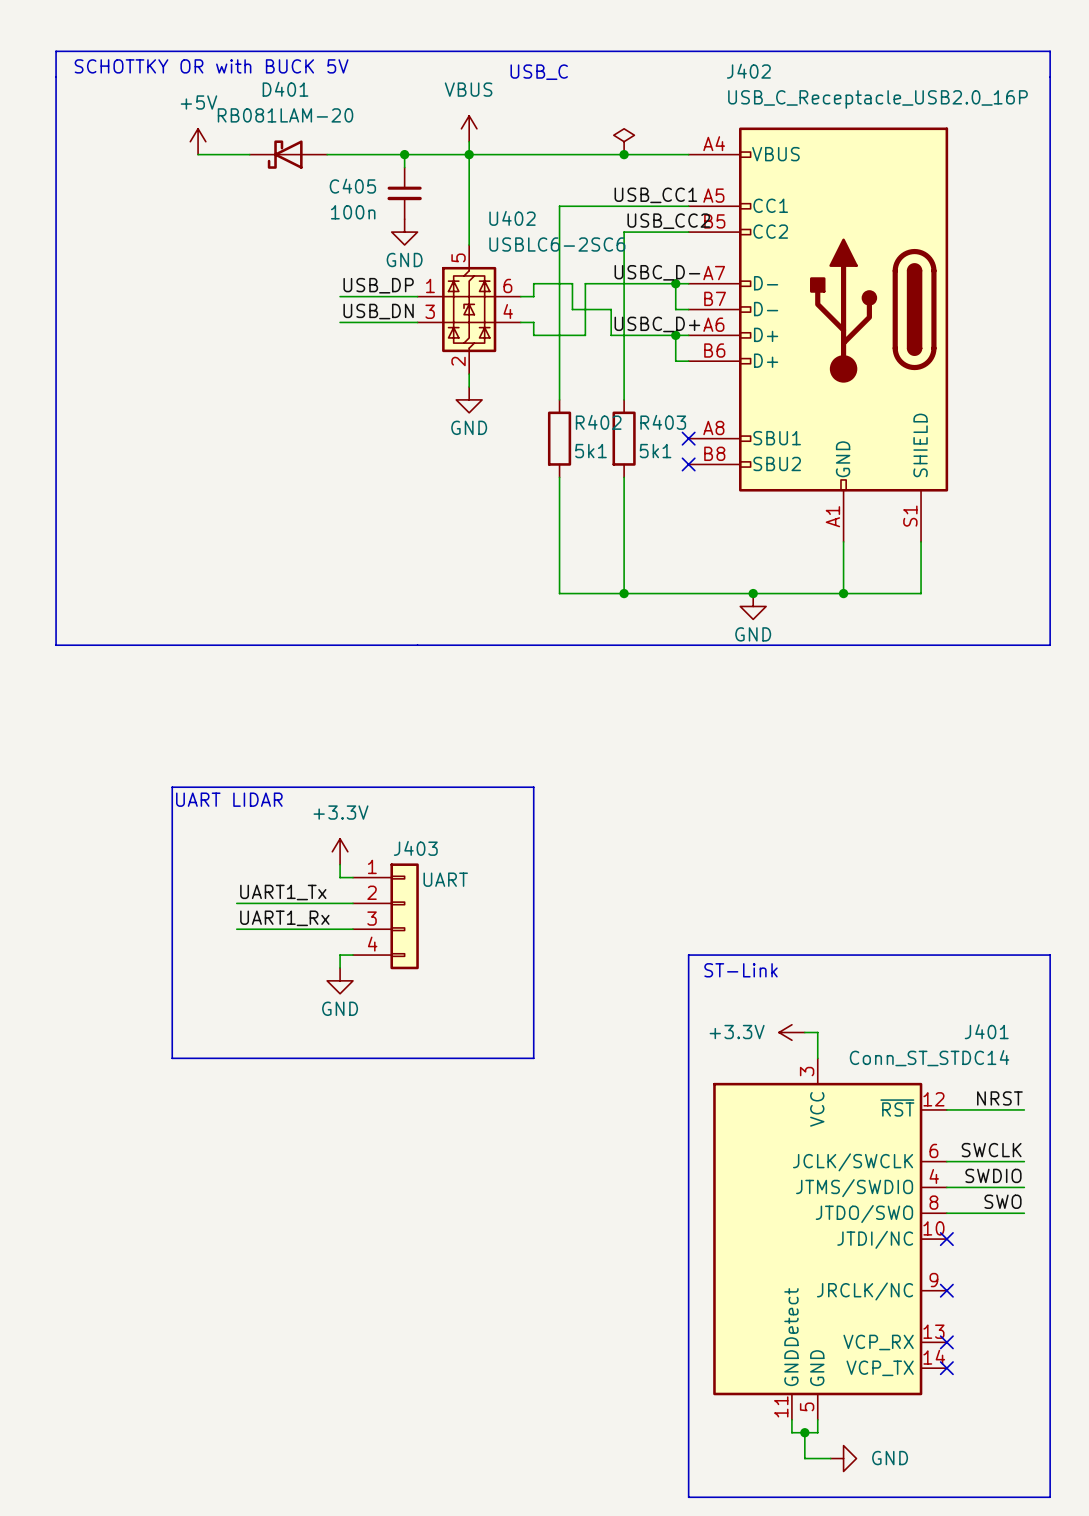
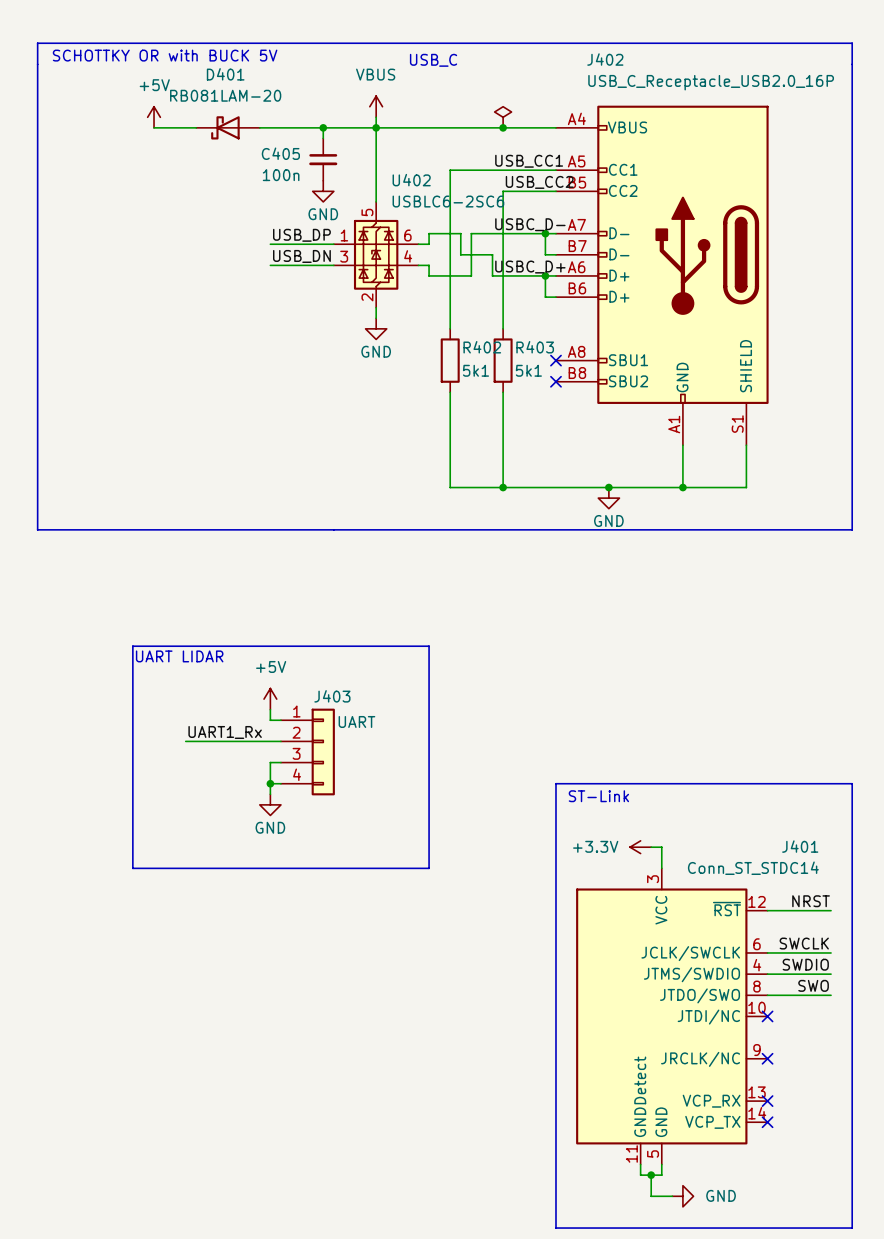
power symbol: +3.3V (340, 851) -> +5V (270, 699)
label: UART1_Tx (283, 892) -> UART1_Rx (225, 732)
label: UART1_Rx (284, 918) -> none
wire: (236, 929) (340, 929) -> (270, 783) (270, 762)
junction: none -> (270, 783)

